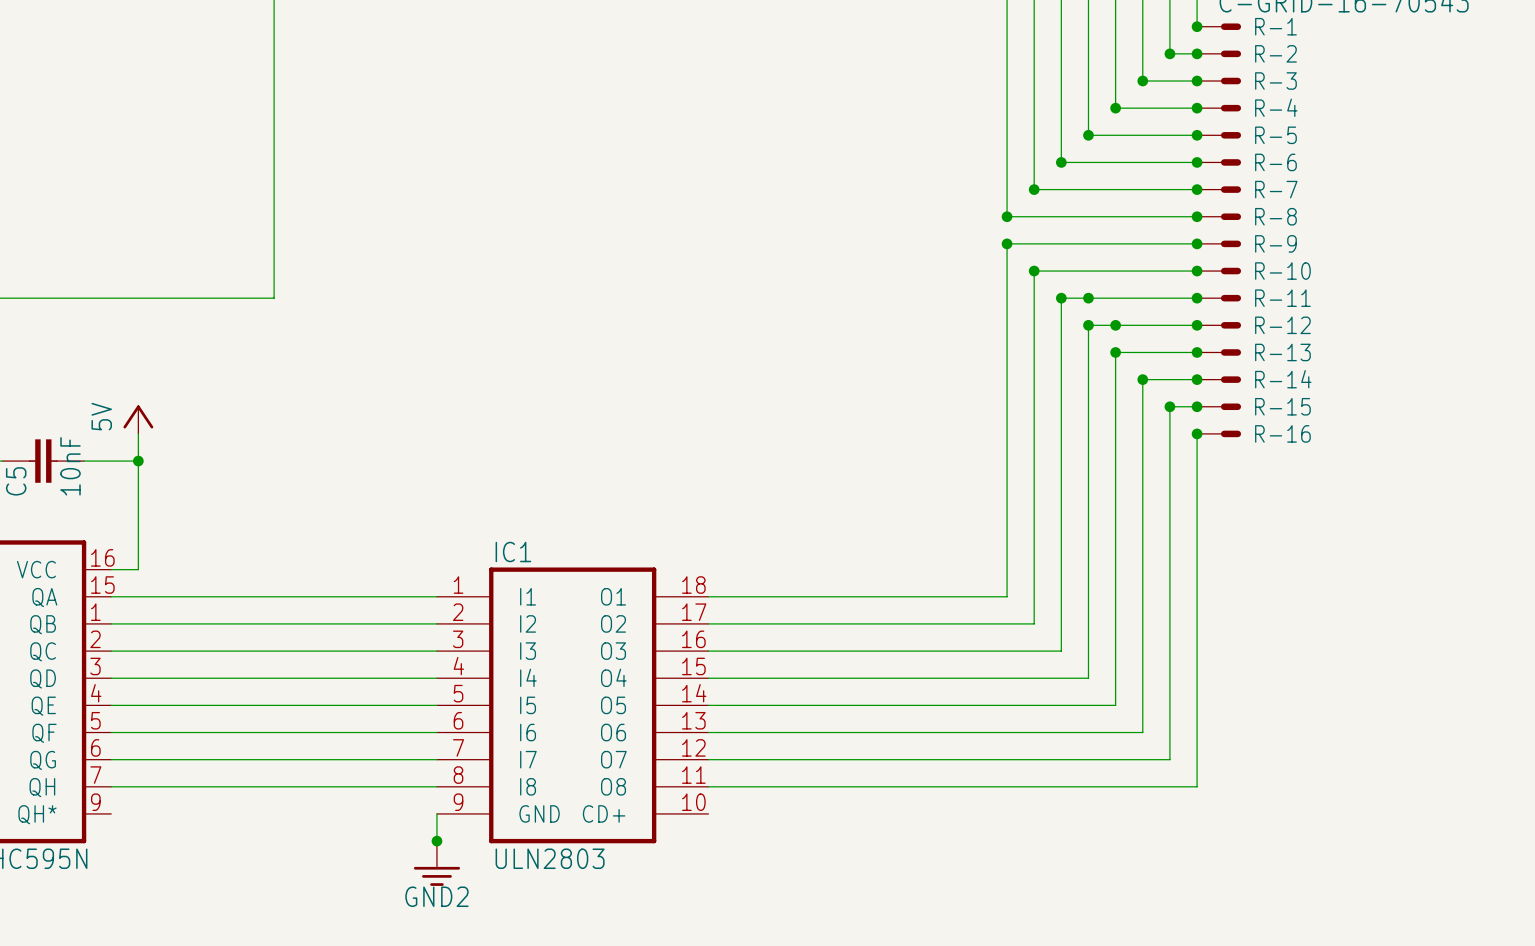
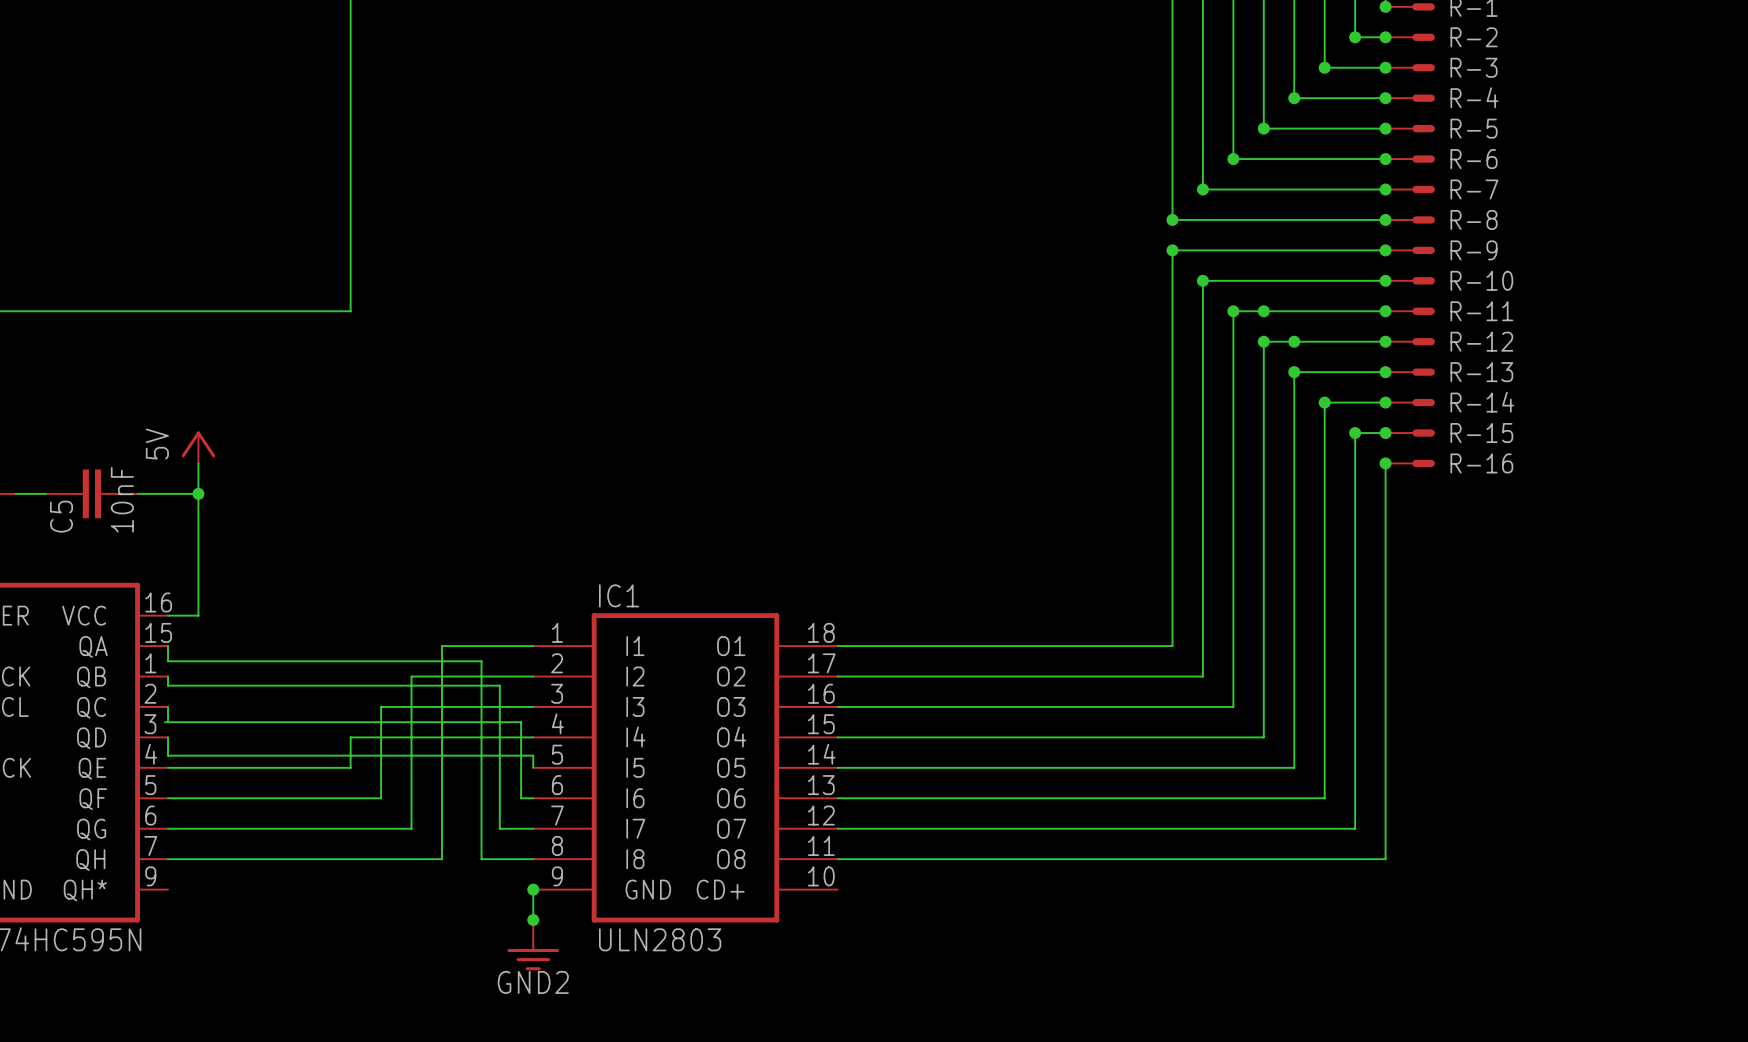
wire: (111, 596) (355, 596) -> (168, 646) (168, 661) (481, 661) (481, 859)
wire: (111, 623) (328, 623) -> (168, 676) (168, 685) (499, 685) (499, 828)
wire: (111, 651) (301, 651) -> (168, 706) (168, 722)
wire: none -> (164, 722) (521, 722) (521, 798)
wire: (111, 678) (274, 678) -> (350, 767) (350, 737)
wire: (274, 705) (436, 705) -> (168, 737) (168, 755) (533, 755) (533, 767)
wire: (301, 732) (426, 732) -> (381, 798) (381, 706)
wire: (328, 759) (407, 759) -> (411, 828) (411, 676)
wire: (355, 786) (390, 786) -> (441, 859) (441, 646)
junction: none -> (533, 889)

